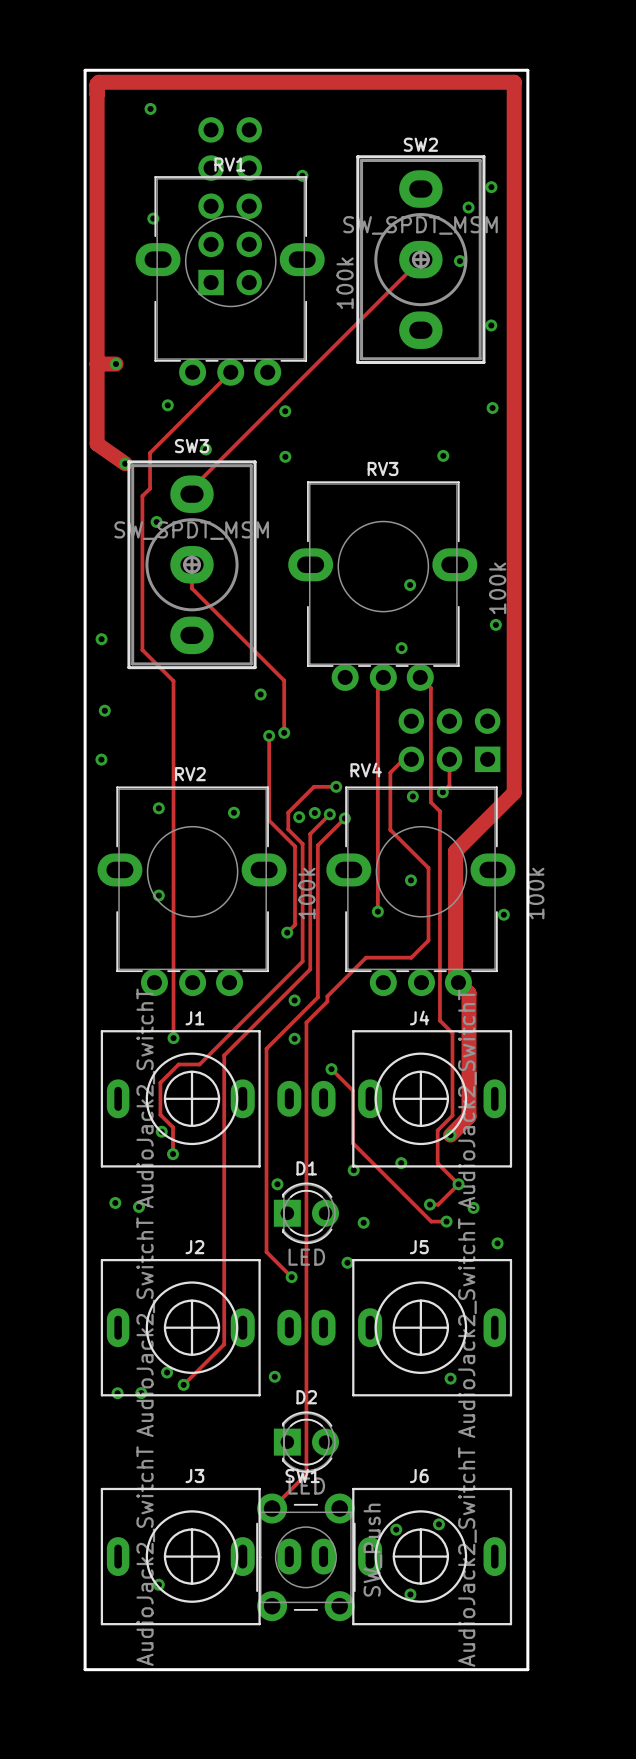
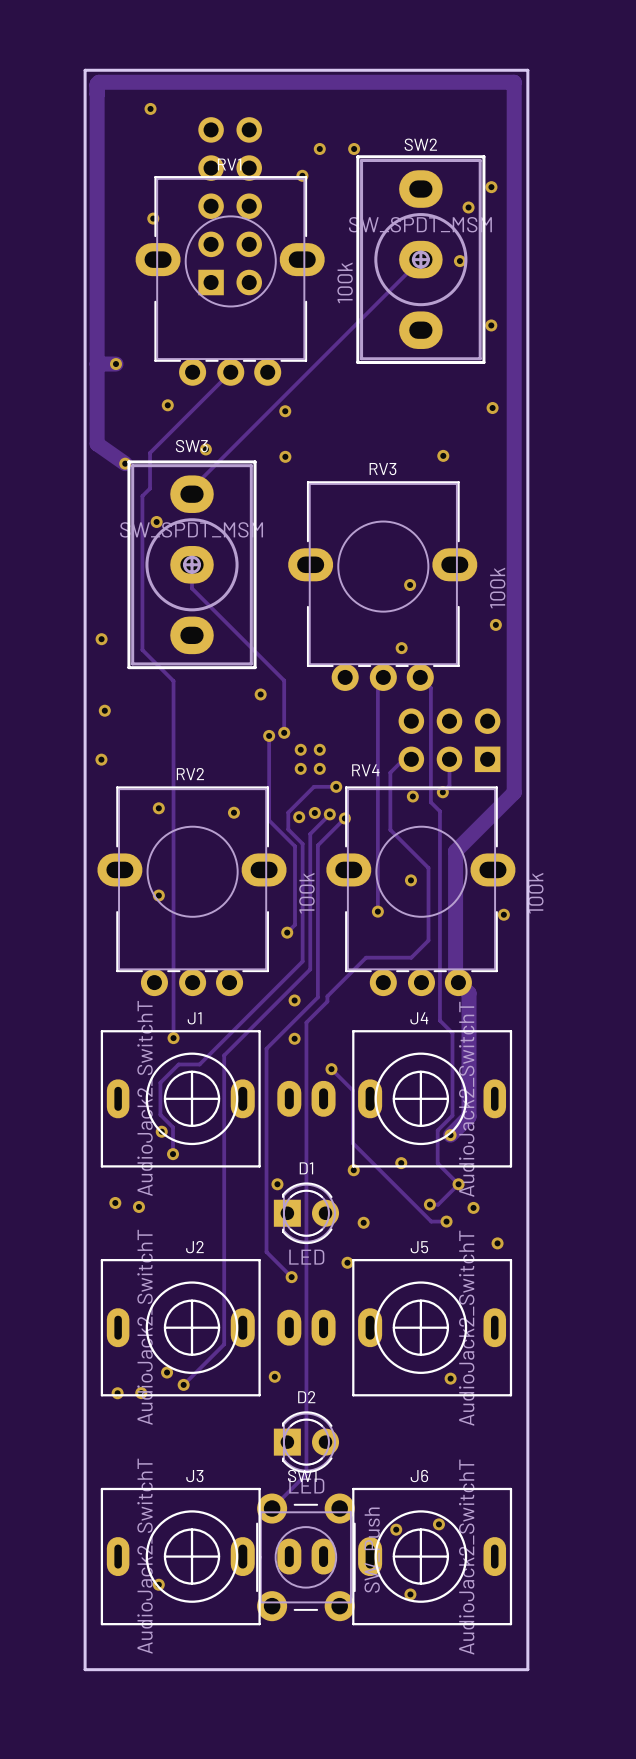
via: none -> (319, 148)
via: none -> (354, 148)
via: none -> (300, 749)
via: none -> (319, 749)
via: none -> (300, 768)
via: none -> (319, 768)

